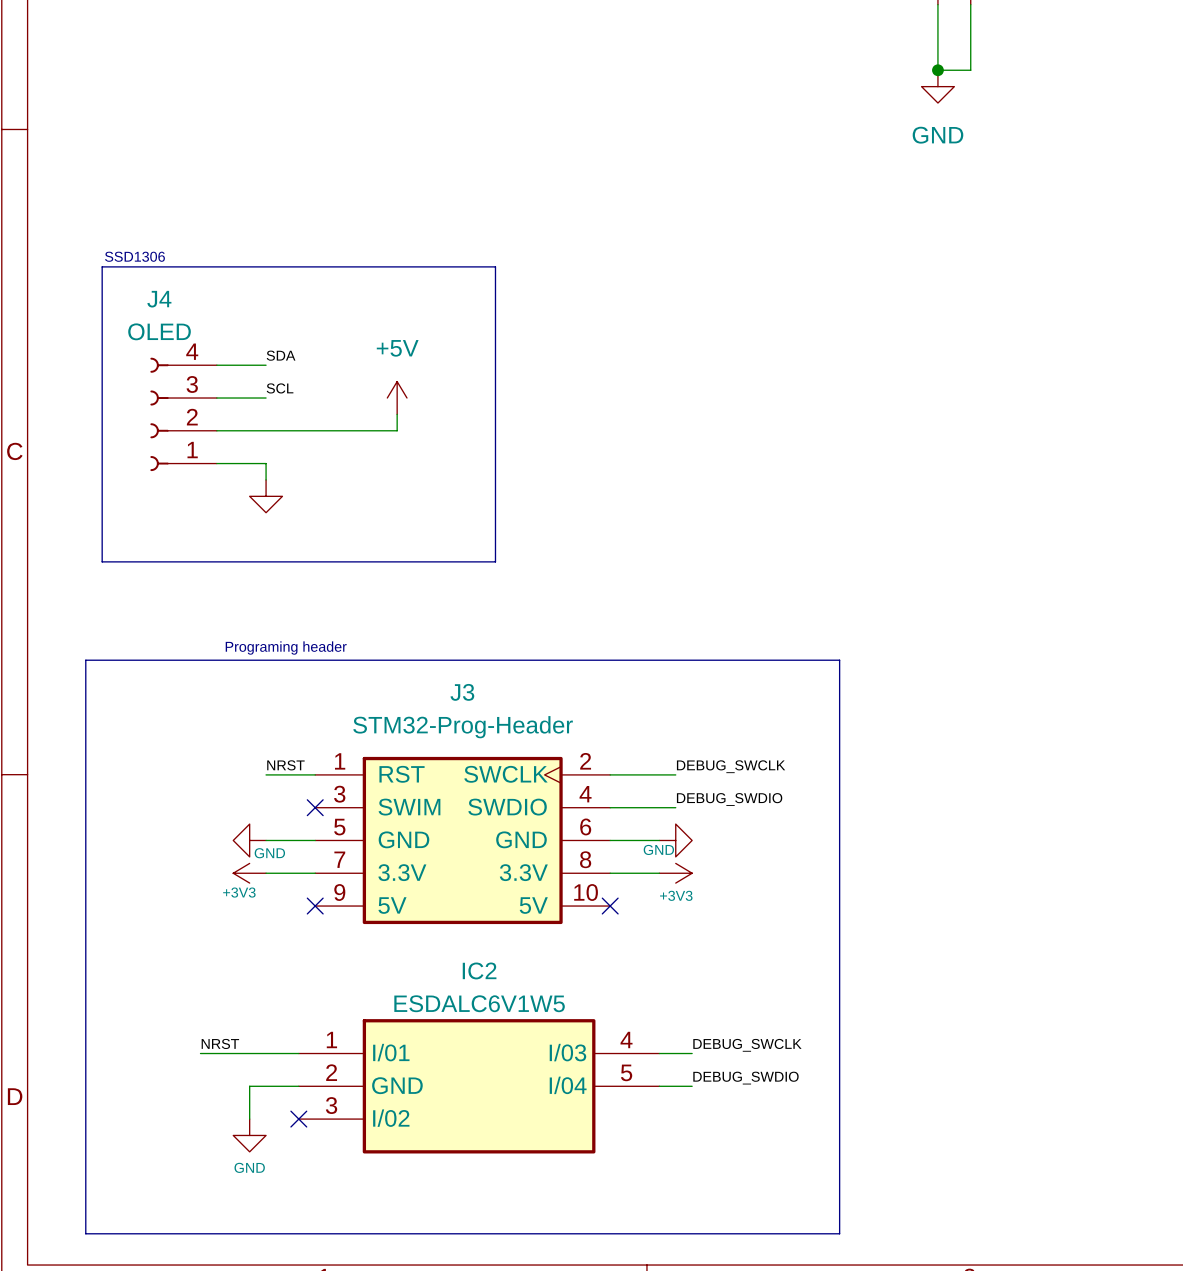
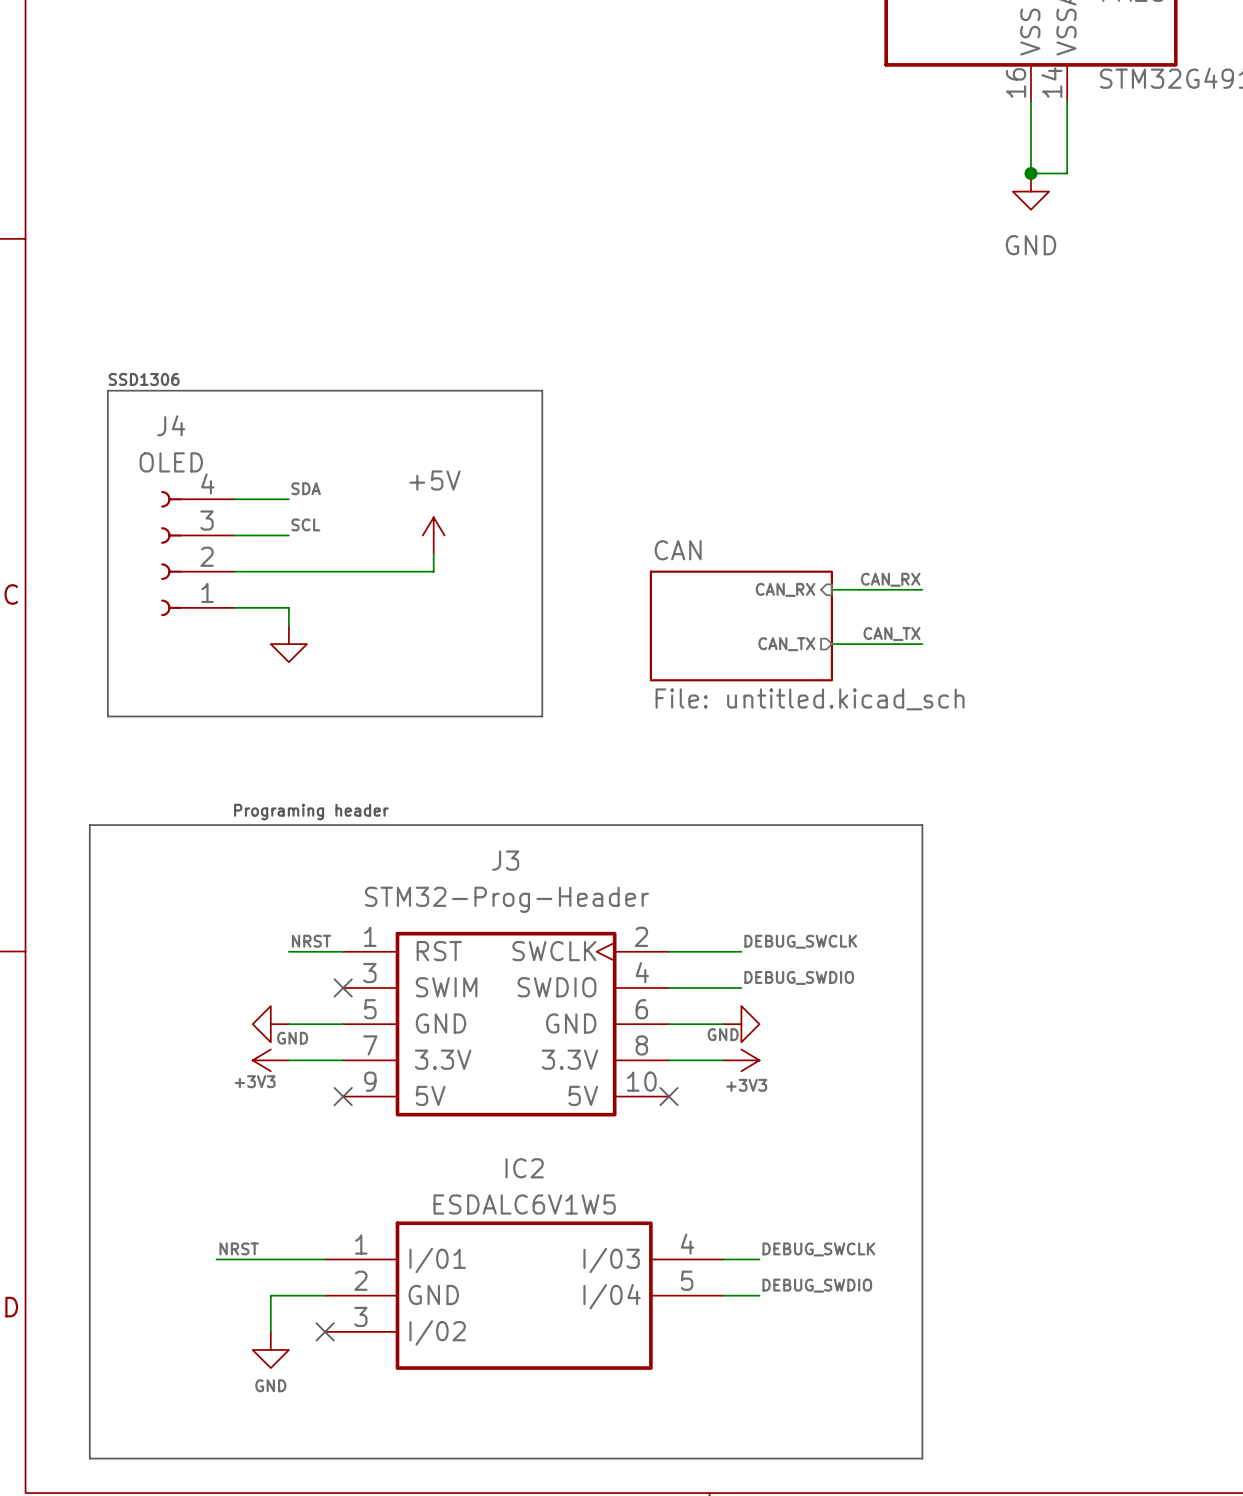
label: none -> CAN_RX (890, 579)
wire: none -> (831, 589) (922, 589)
sheet pin: none -> CAN_RX (785, 589)
sheet CAN: none -> File: untitled.kicad_sch (741, 625)
label: none -> CAN_TX (892, 634)
wire: none -> (831, 644) (922, 644)
sheet pin: none -> CAN_TX (786, 644)

